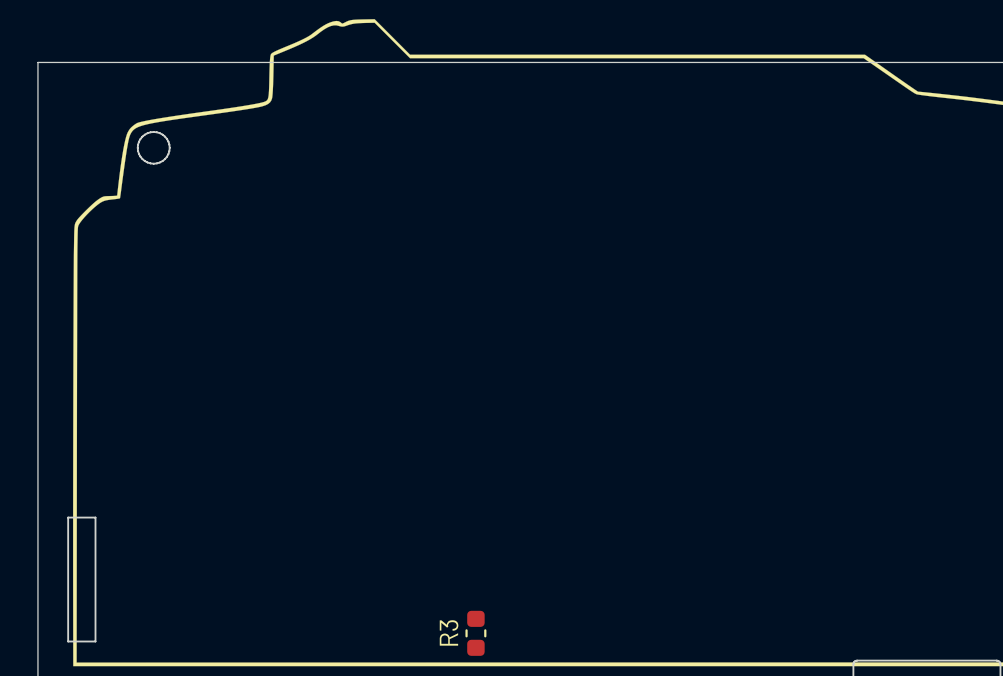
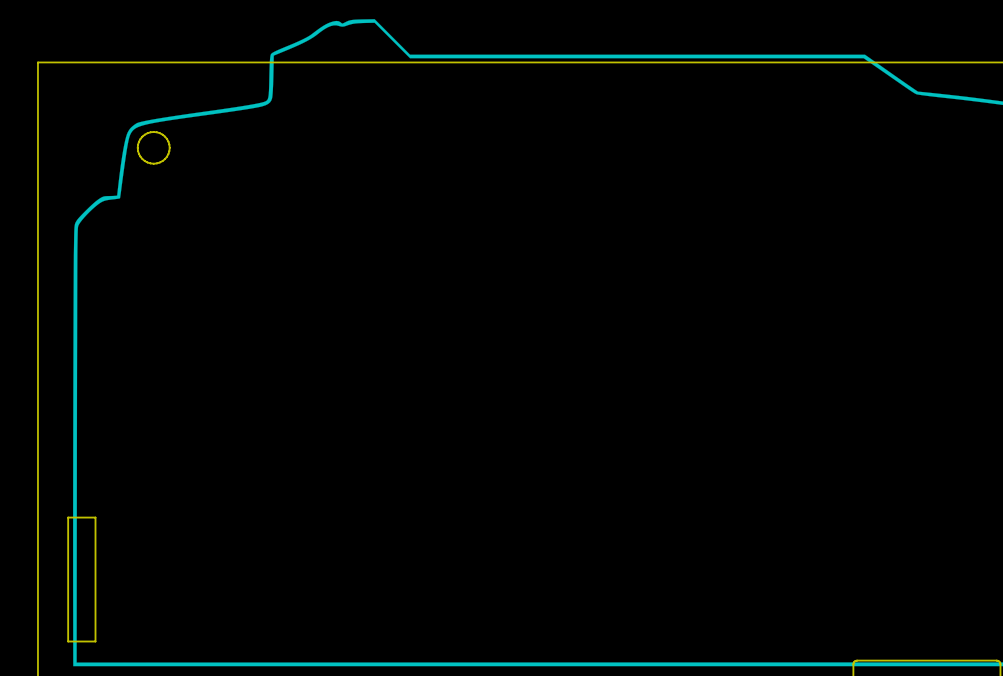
R3: (475, 633) -> none

